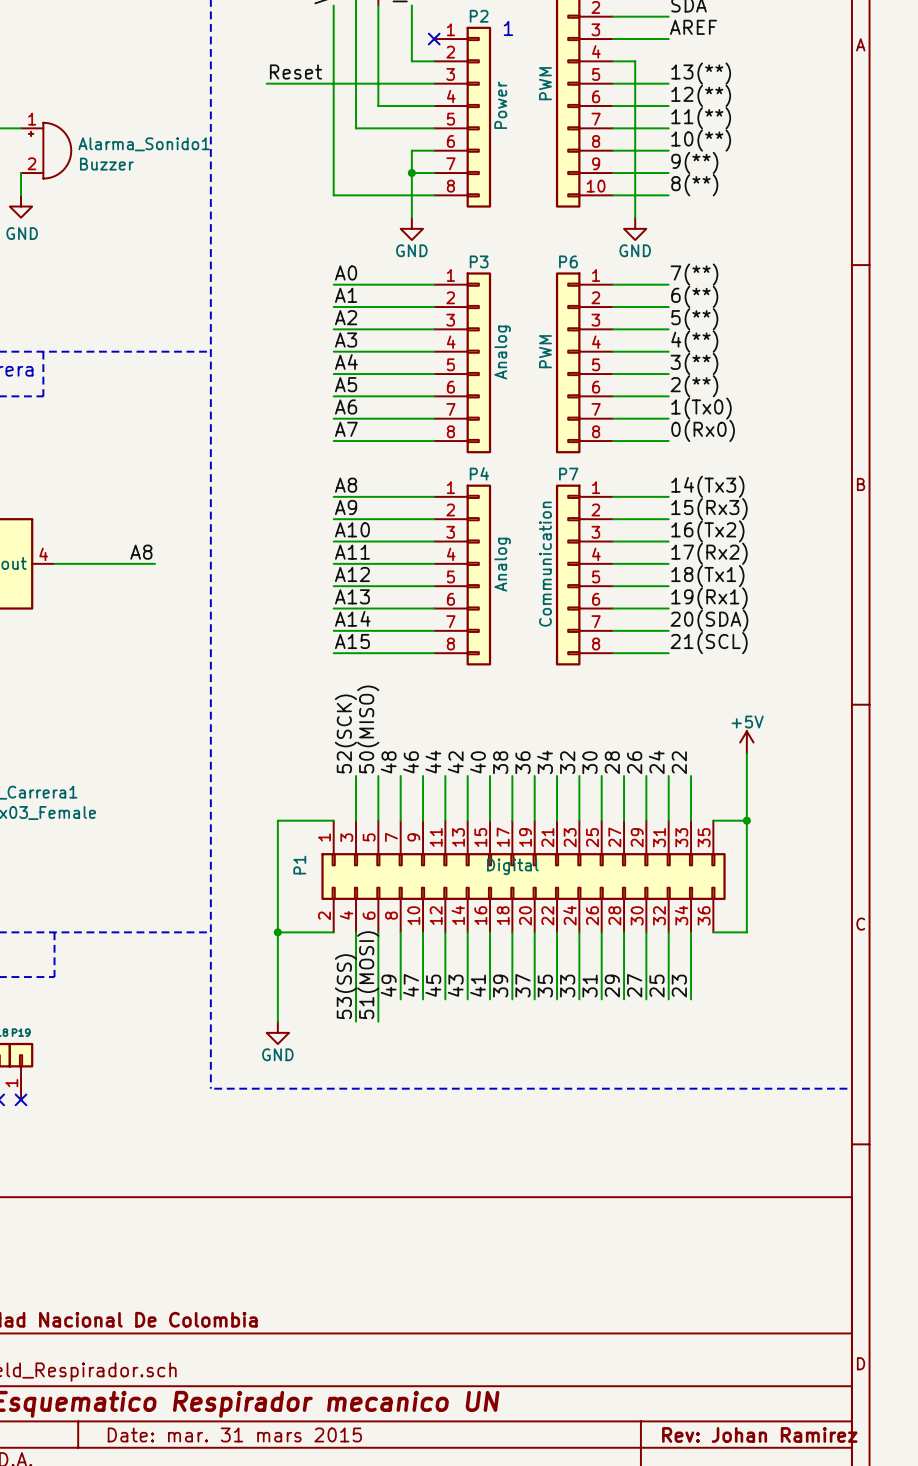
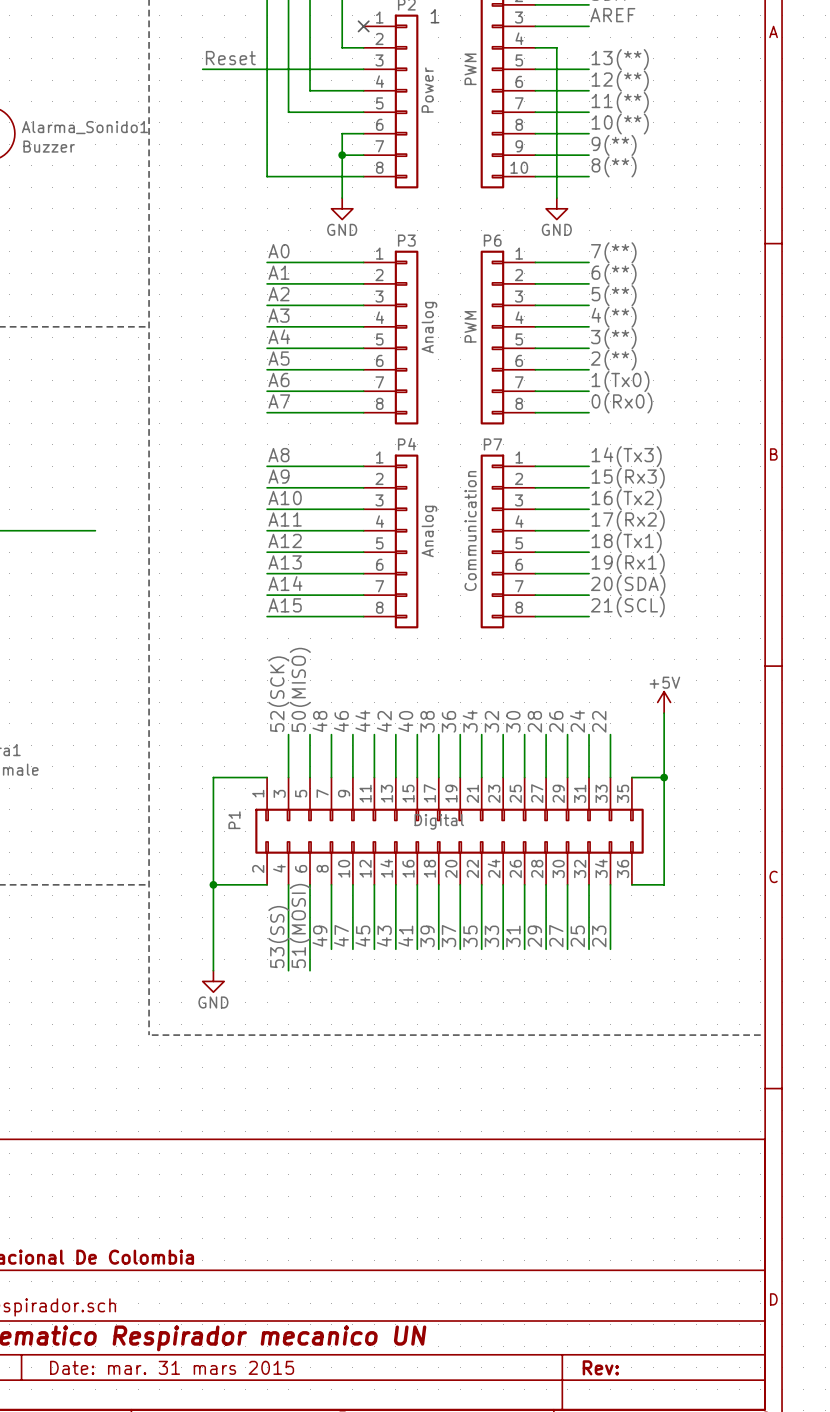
label: A8 (141, 552) -> none
title block: Rev: Johan Ramirez (759, 1434) -> Rev: (600, 1367)

